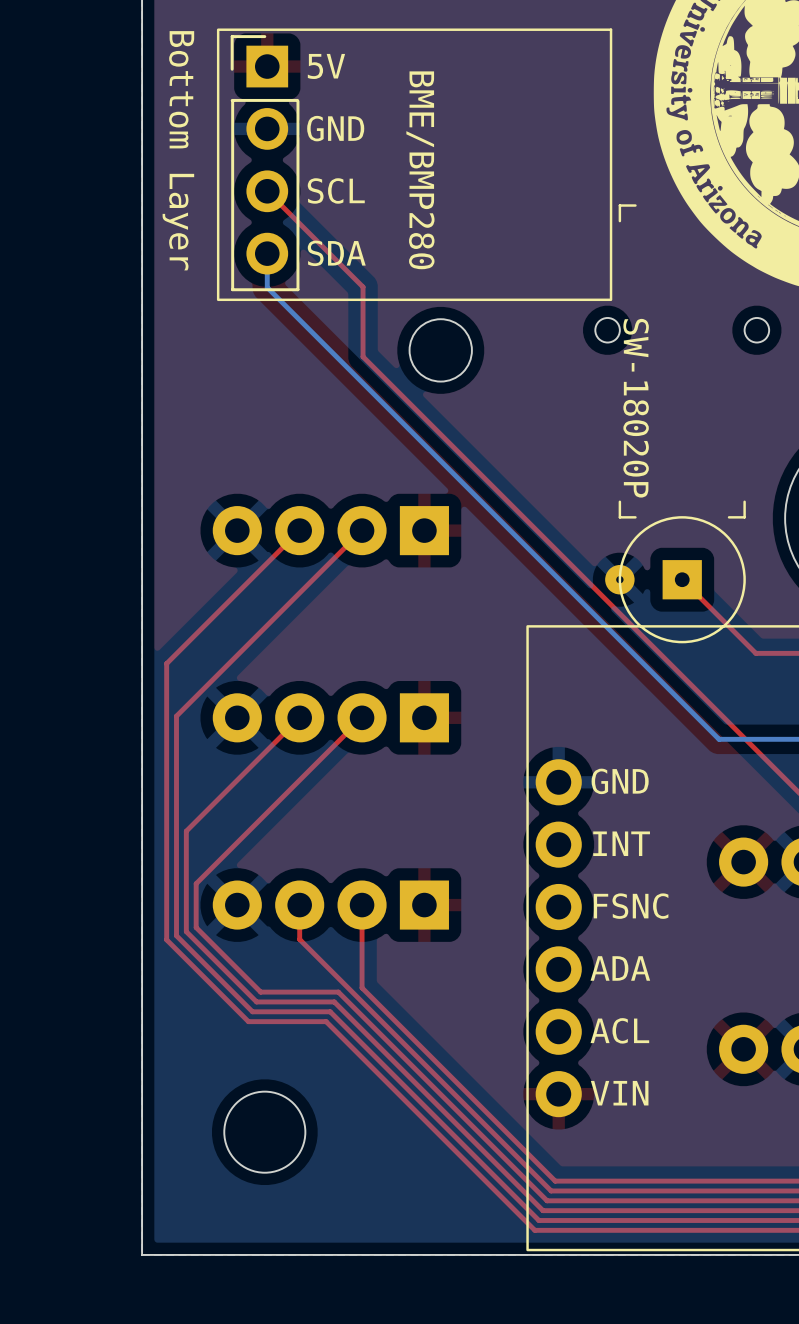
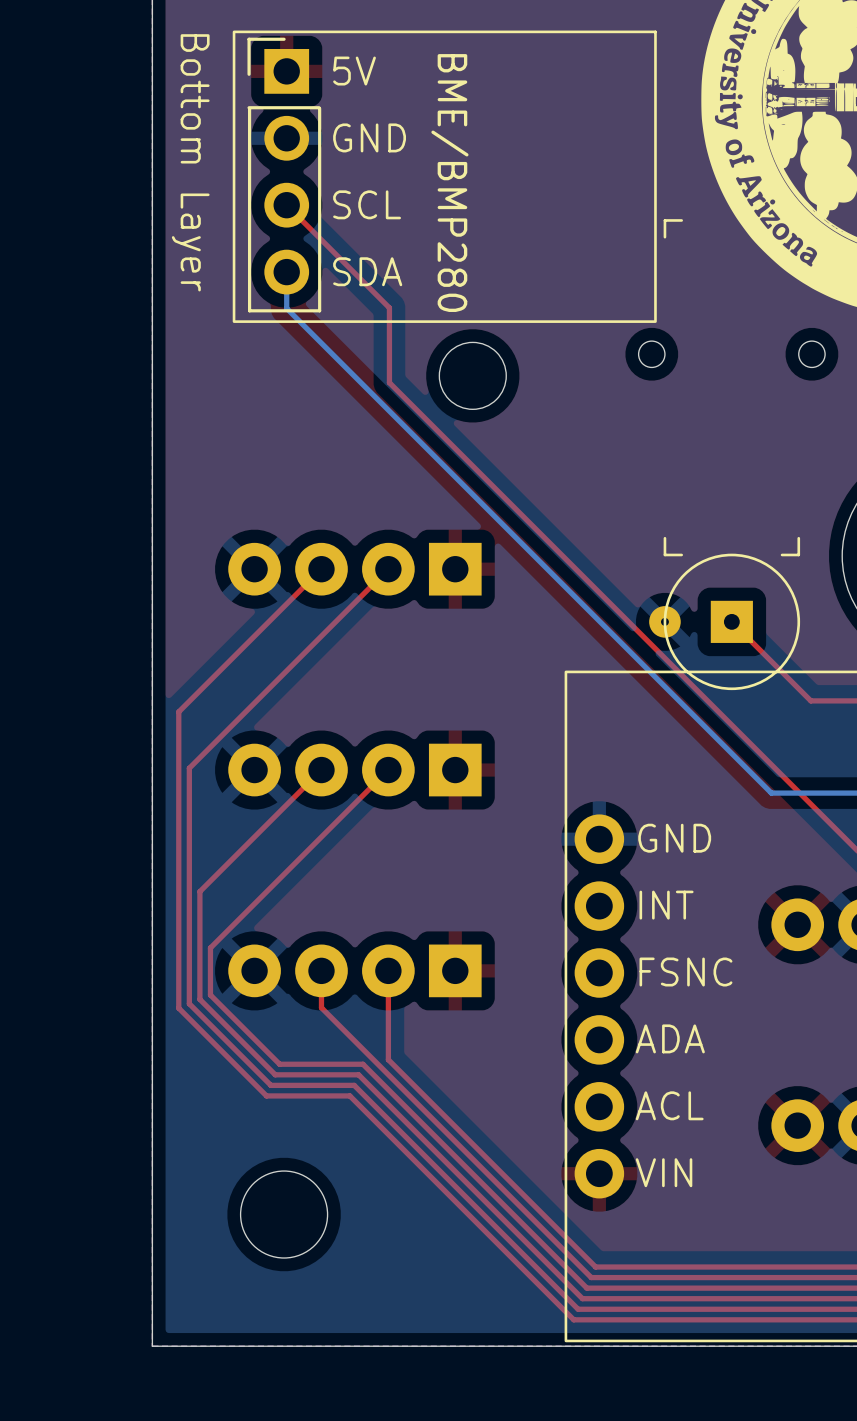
drawing: [623, 318, 649, 498] -> none

